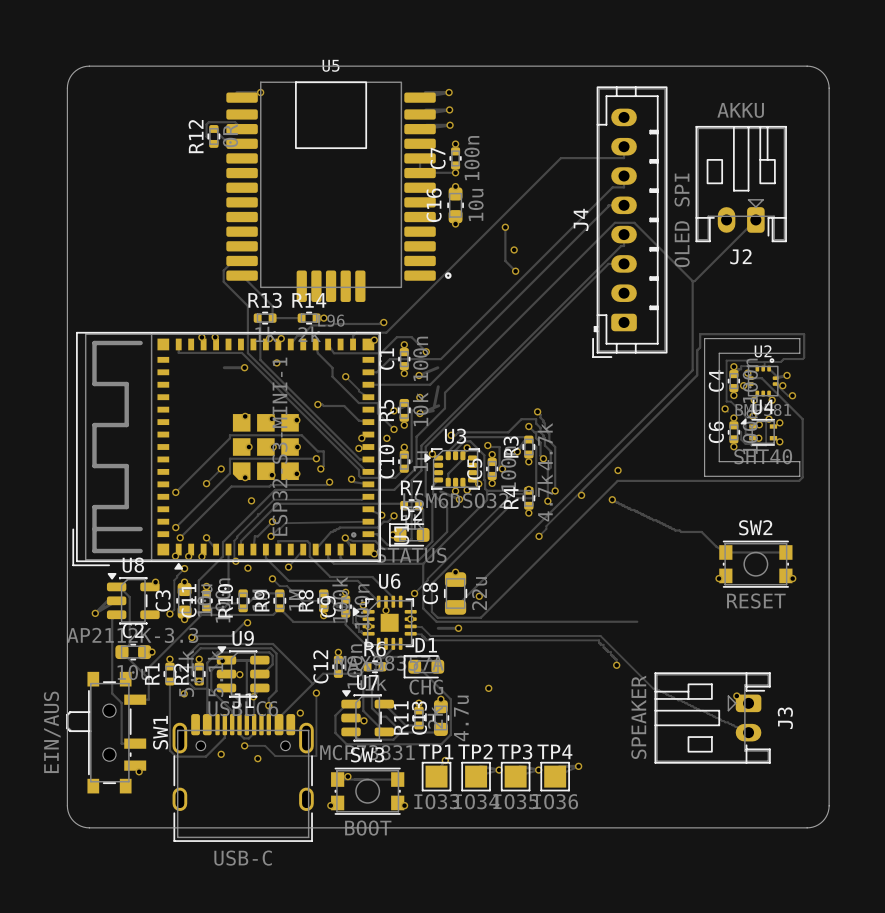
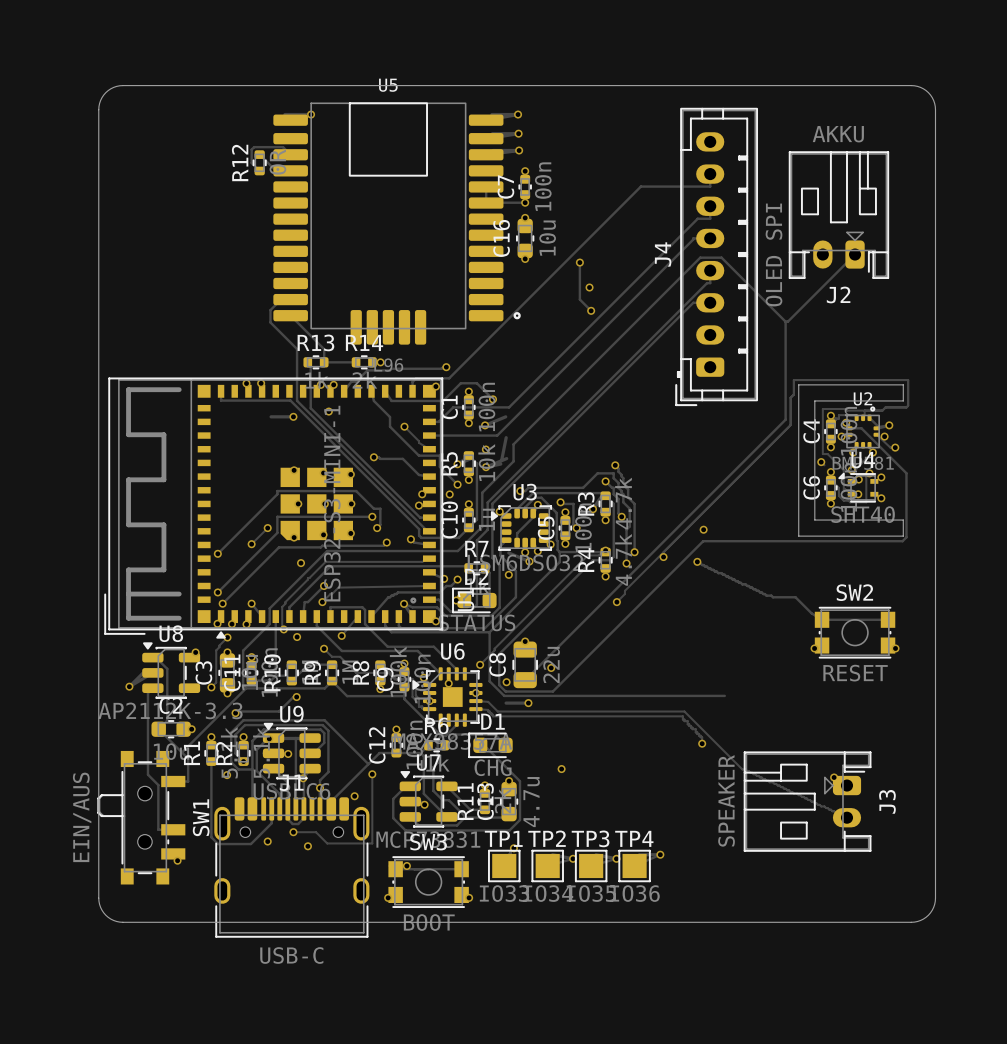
via: none -> (508, 574)
via: none -> (506, 682)

